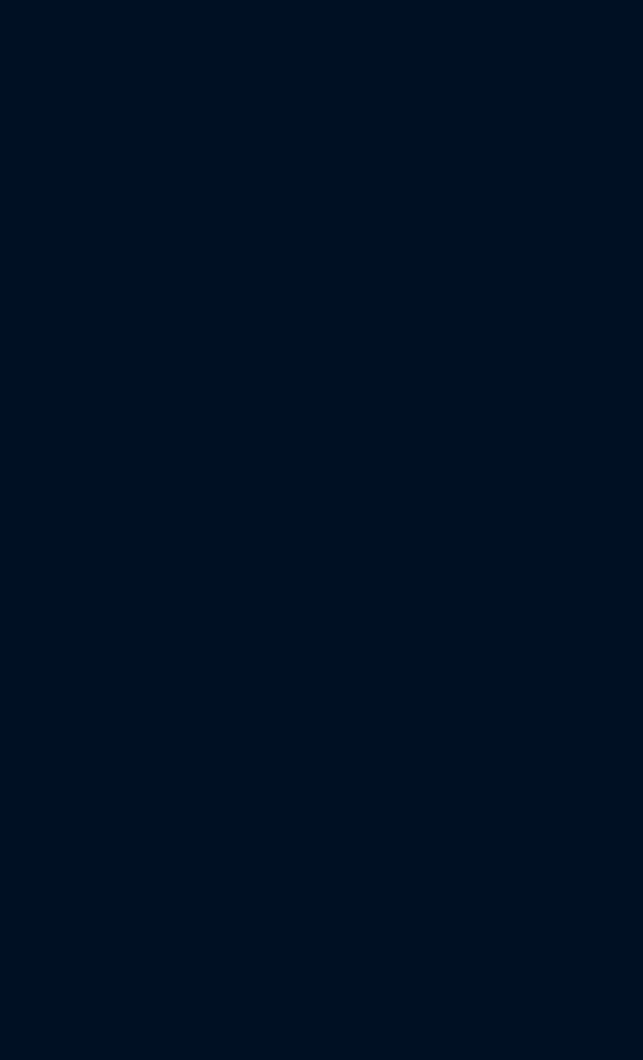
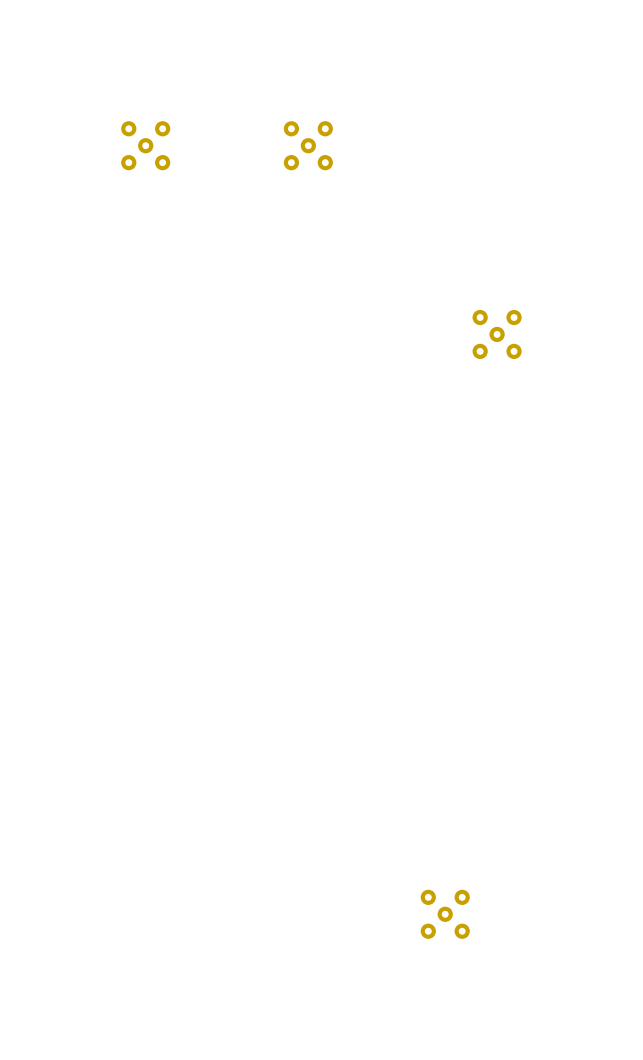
part: none -> (145, 145)
part: none -> (308, 145)
part: none -> (497, 334)
part: none -> (445, 914)

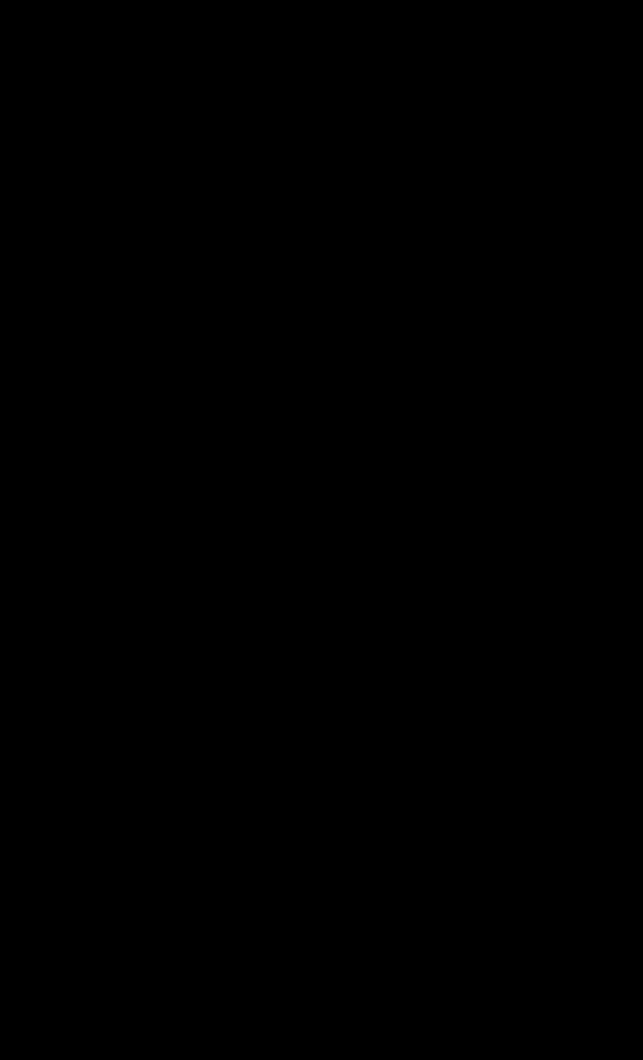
part: (145, 145) -> none
part: (308, 145) -> none
part: (497, 334) -> none
part: (445, 914) -> none

